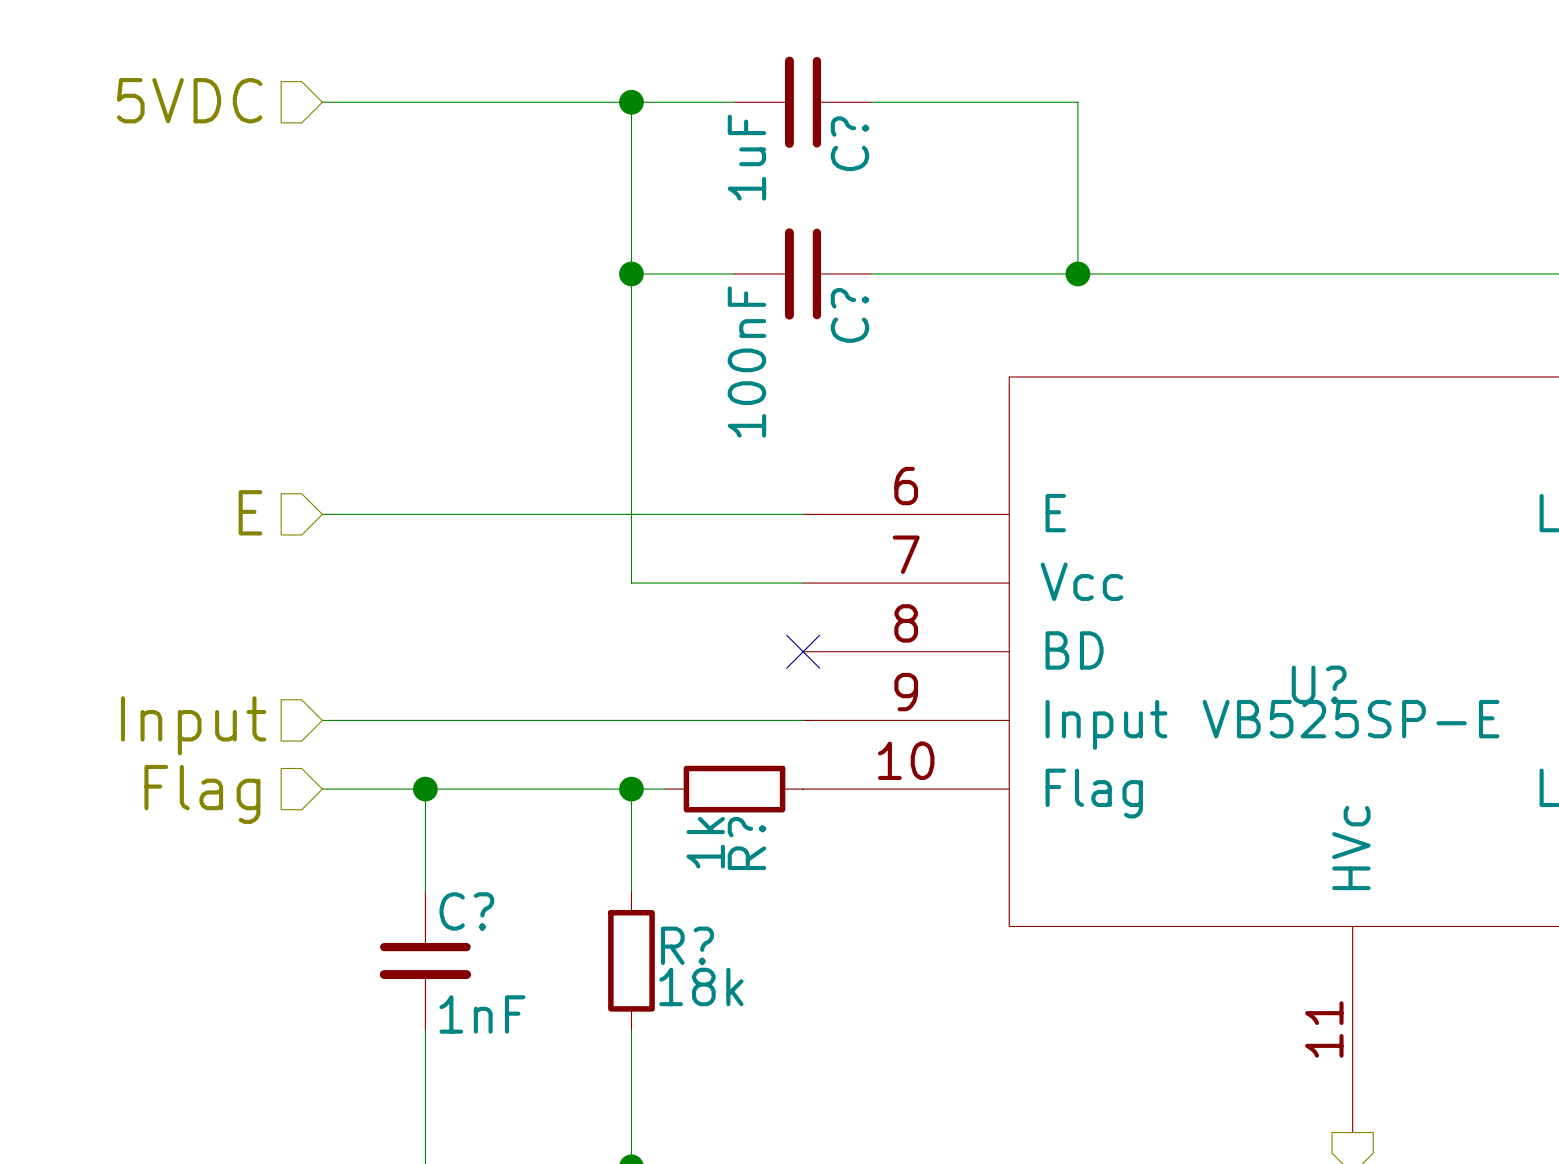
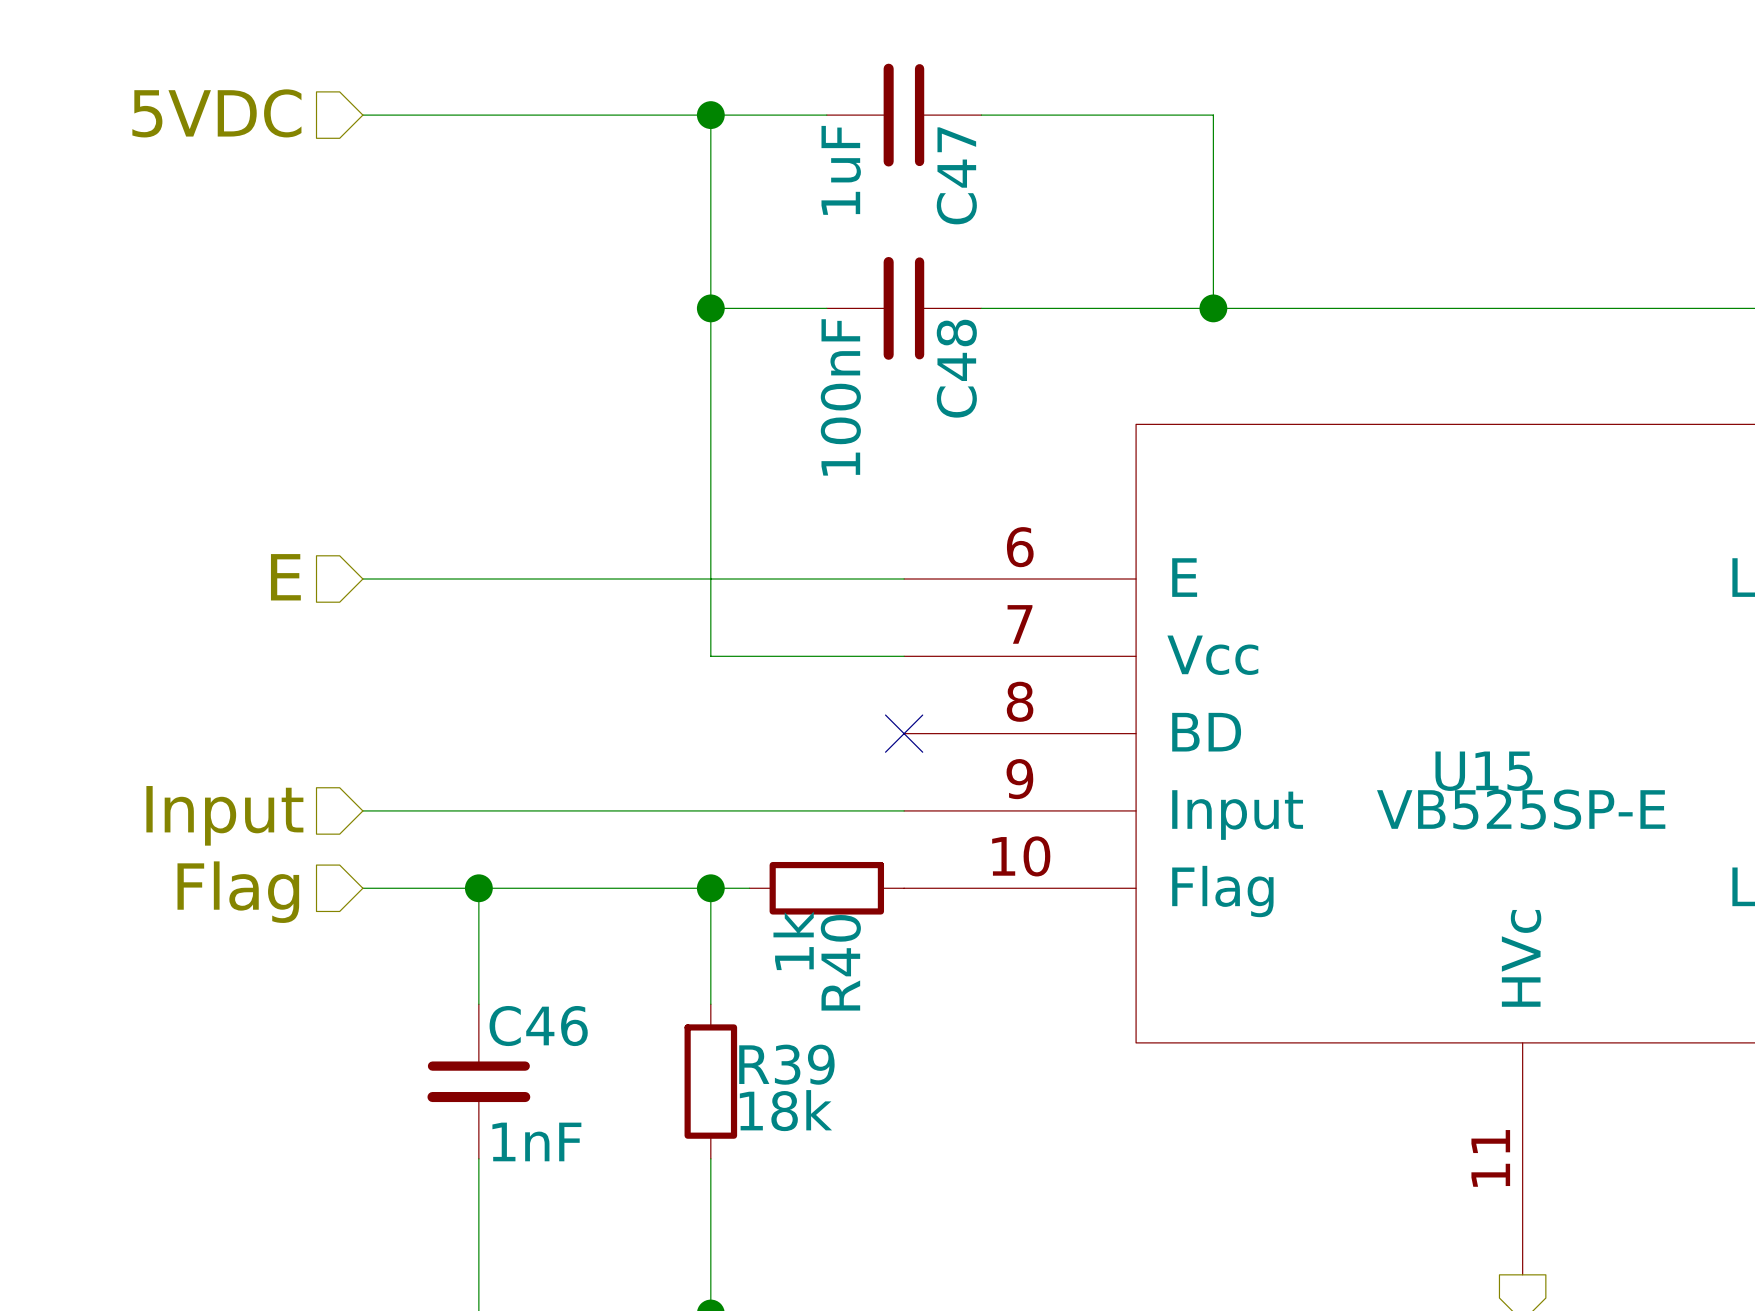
C? name: C? (849, 143) -> C47 (956, 175)
C? name: C? (849, 315) -> C48 (956, 368)
U? name: U? (1319, 684) -> U15 (1483, 771)
R? name: R? (746, 843) -> R40 (840, 962)
C? name: C? (466, 911) -> C46 (538, 1026)
R? name: R? (687, 945) -> R39 (786, 1064)

